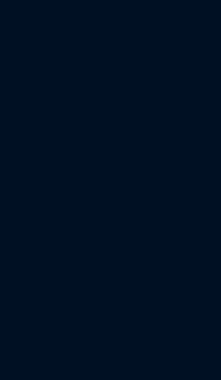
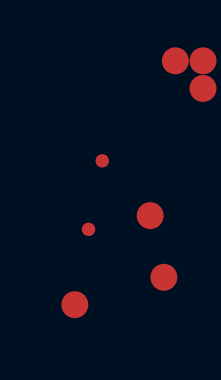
part: none -> (175, 60)
part: none -> (203, 60)
part: none -> (203, 88)
part: none -> (102, 160)
part: none -> (150, 215)
part: none -> (88, 229)
part: none -> (163, 277)
part: none -> (74, 304)

